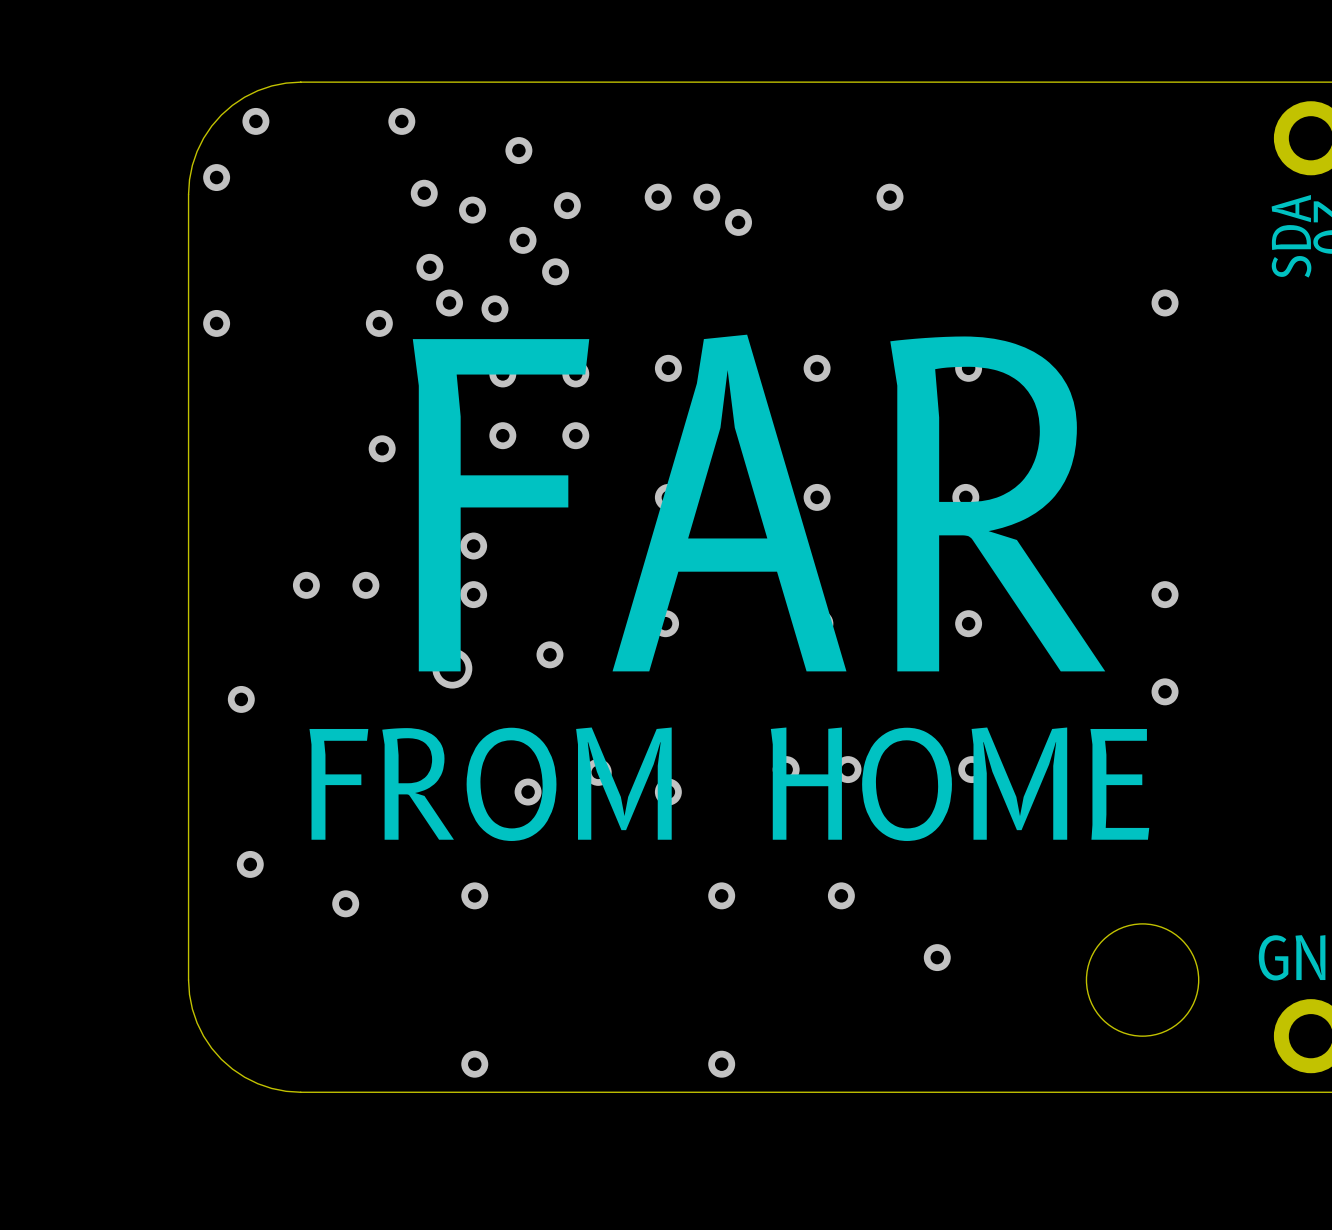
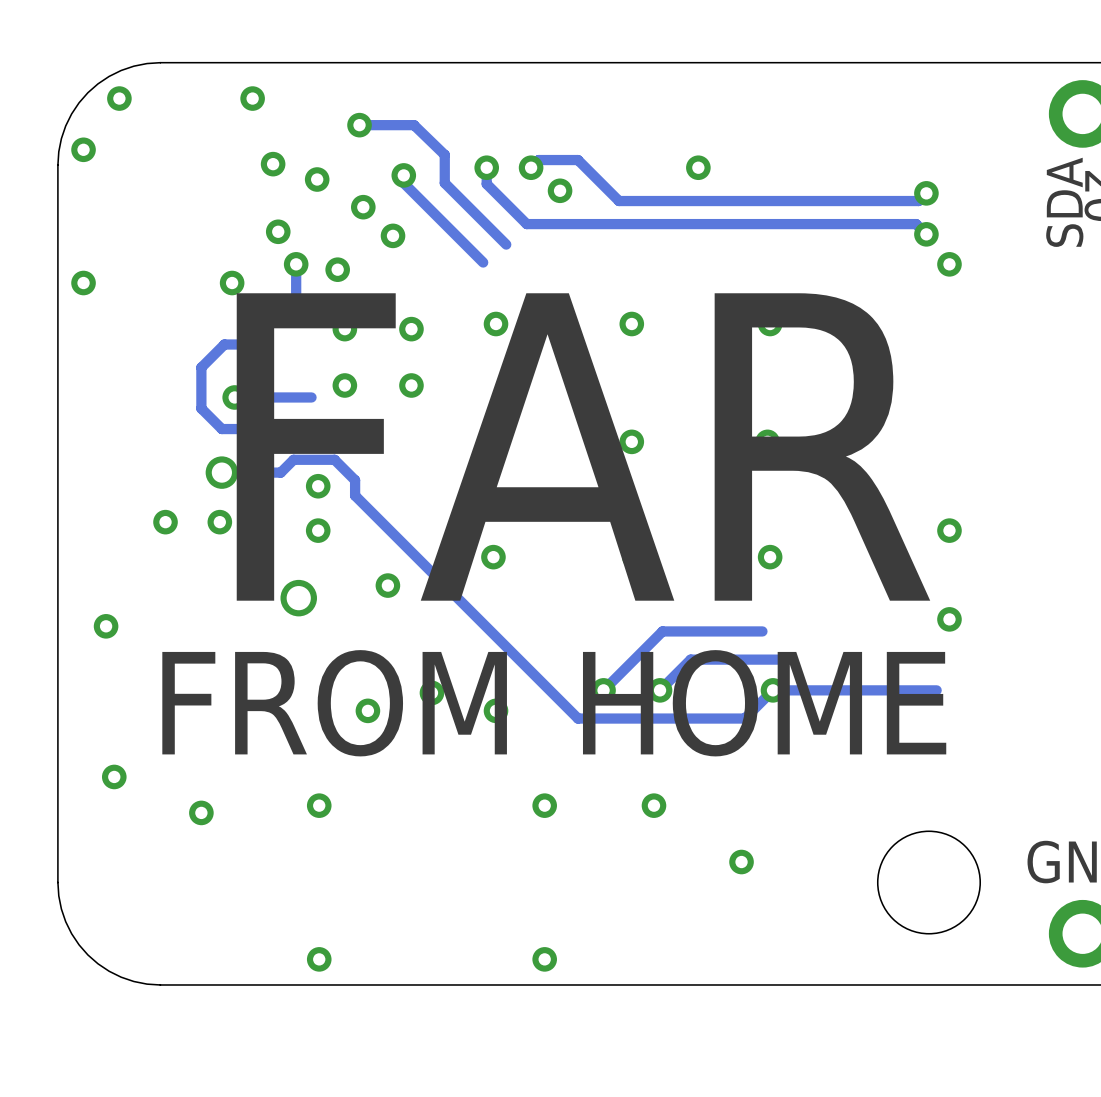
track: none -> (359, 125) (414, 125) (444, 154) (444, 183) (506, 244)
track: none -> (486, 167) (486, 184) (526, 224) (916, 224) (926, 234)
track: none -> (531, 167) (538, 160) (577, 160) (618, 201) (918, 201) (926, 193)
track: none -> (403, 175) (403, 183) (483, 262)
via: none -> (926, 193)
via: none -> (926, 234)
track: none -> (296, 264) (296, 298) (250, 344) (224, 344) (201, 367) (201, 408) (221, 429) (332, 429)
track: none -> (311, 397) (234, 397)
track: none -> (221, 472) (280, 472) (293, 459) (334, 459) (355, 480) (355, 495) (577, 718) (744, 718) (773, 690) (936, 690)
via: none -> (221, 472)
track: none -> (762, 631) (662, 631) (603, 690)
track: none -> (788, 659) (690, 659) (659, 690)

